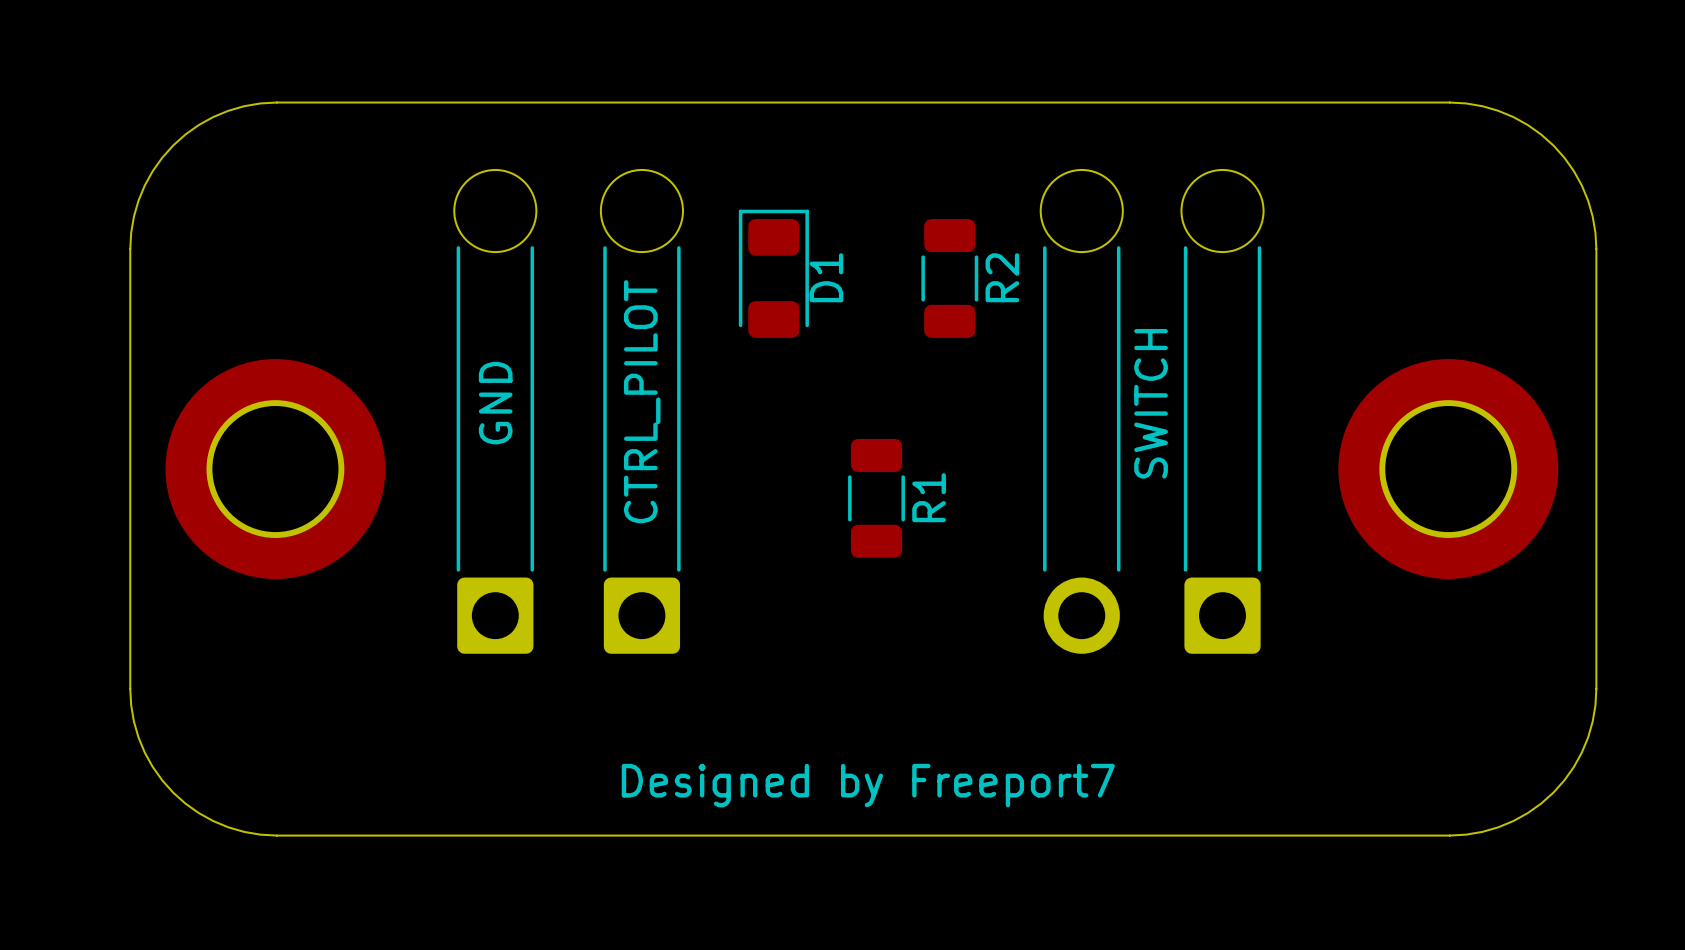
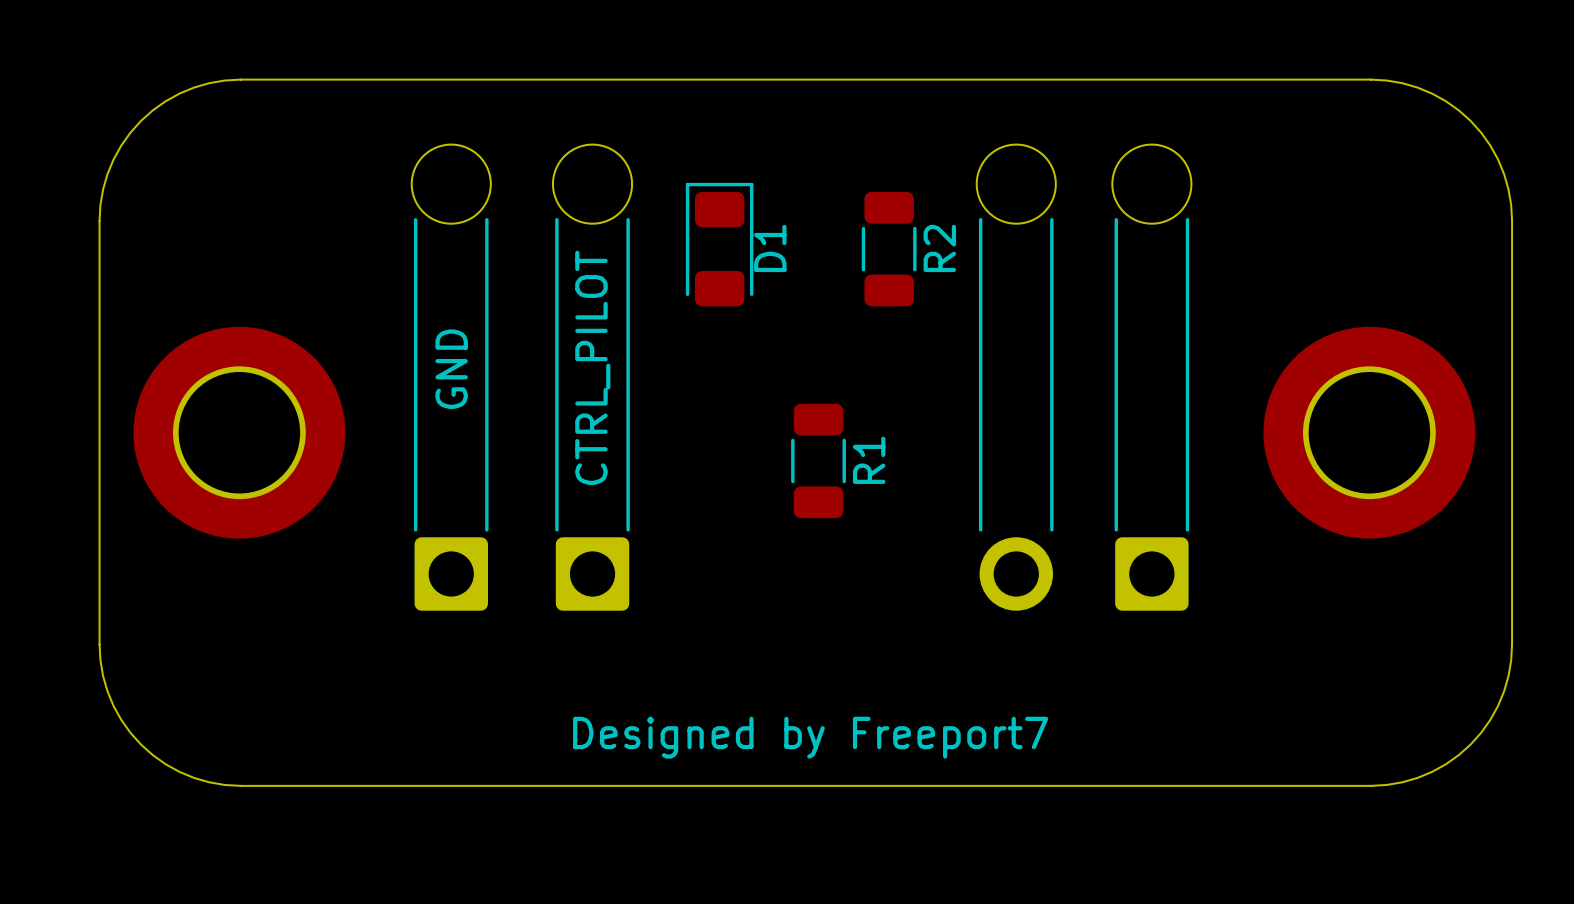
part value: SWITCH (1151, 403) -> none

